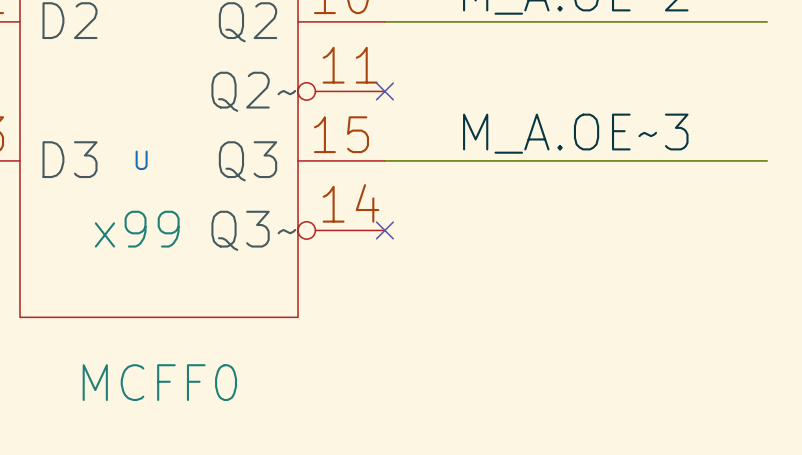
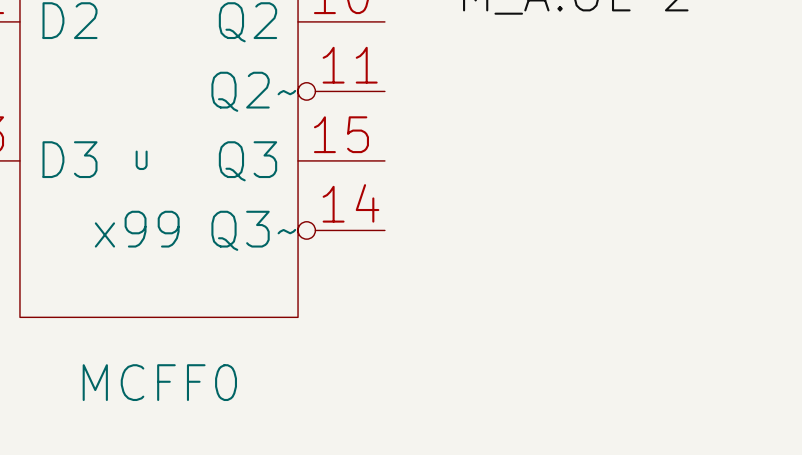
wire: (384, 21) (767, 21) -> none
no-connect mark: (384, 91) -> none
label: M_A.OE~3 (575, 133) -> none
wire: (384, 160) (767, 160) -> none
no-connect mark: (384, 230) -> none

